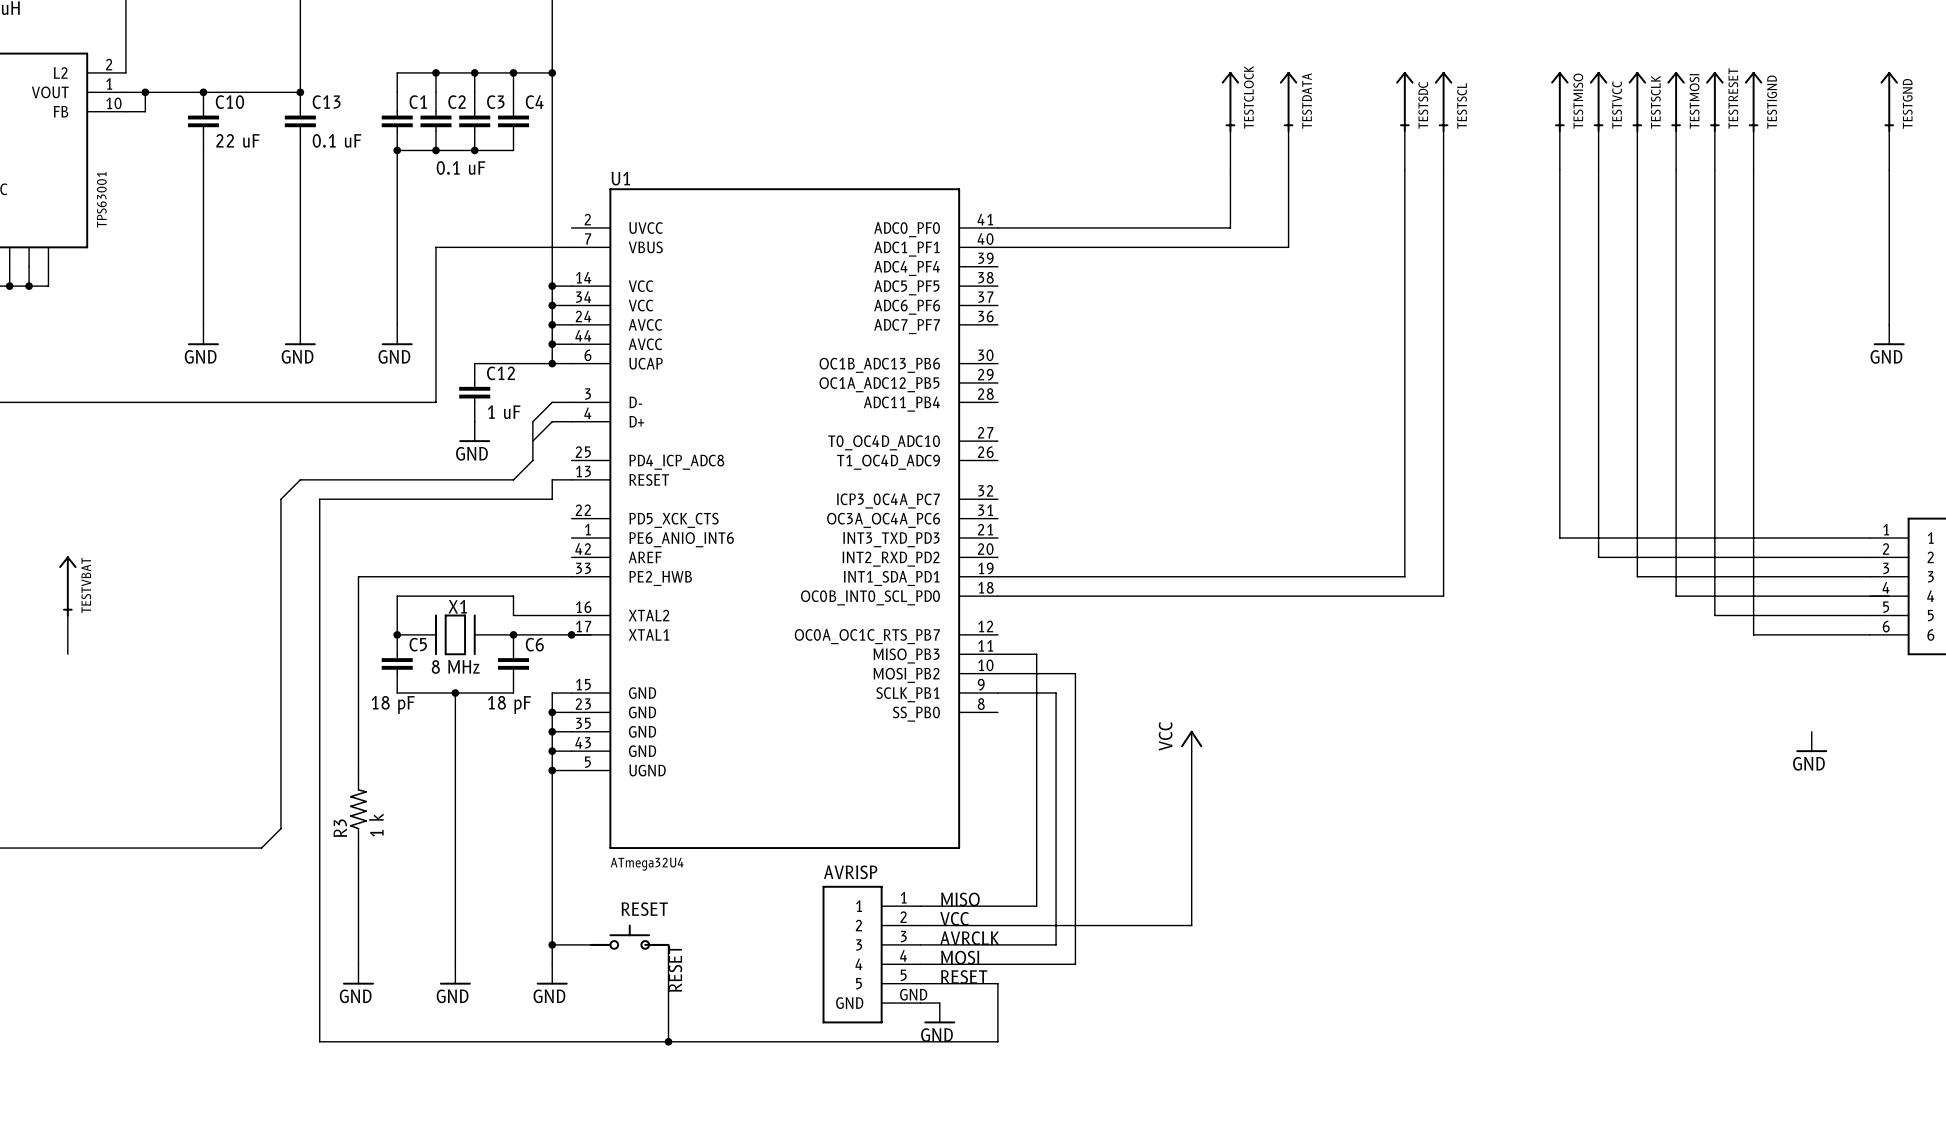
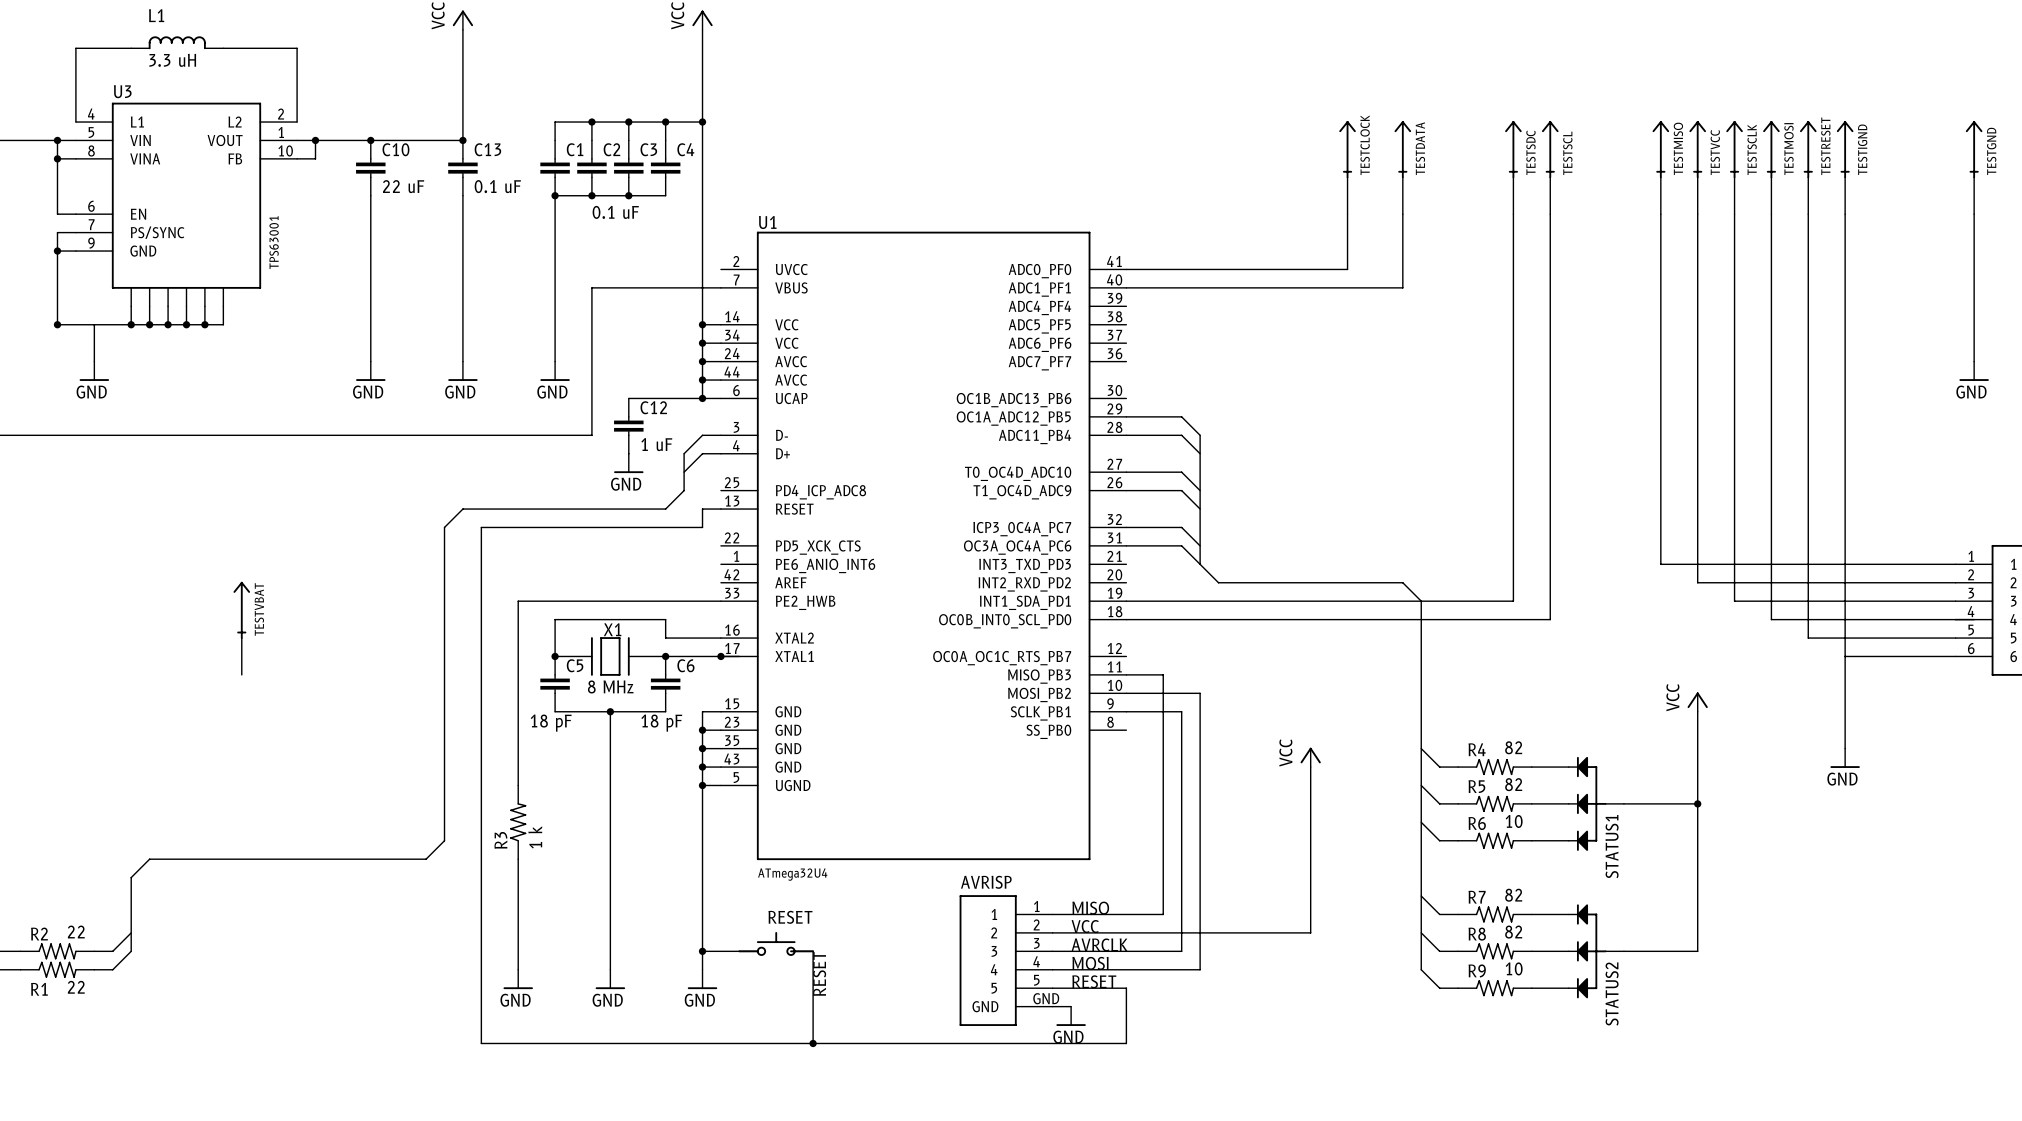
wire: none -> (1126, 416) (1181, 416) (1200, 435)
wire: none -> (1126, 435) (1181, 435) (1200, 453)
bus: none -> (1200, 435) (1200, 564) (1218, 582) (1402, 582) (1421, 601) (1421, 969)
wire: none -> (1126, 472) (1181, 472) (1200, 490)
wire: none -> (1126, 490) (1181, 490) (1200, 509)
wire: none -> (1126, 527) (1181, 527) (1200, 545)
wire: none -> (1126, 545) (1181, 545) (1200, 564)
wire: none -> (1845, 656) (1845, 748)
power symbol: none -> VCC (1697, 702)
wire: none -> (1697, 711) (1697, 951) (1623, 951)
wire: none -> (1421, 748) (1439, 767) (1458, 767)
power symbol position: GND (1811, 741) -> GND (1845, 758)
R4: none -> 82 (1494, 767)
wire: none -> (1531, 767) (1568, 767)
wire: none -> (1421, 785) (1439, 803) (1458, 803)
R5: none -> 82 (1494, 803)
wire: none -> (1531, 803) (1568, 803)
STATUS1: none -> (1596, 803)
wire: none -> (1623, 803) (1697, 803)
junction: none -> (1697, 803)
wire: none -> (1421, 822) (1439, 840) (1458, 840)
R6: none -> 10 (1494, 840)
wire: none -> (1531, 840) (1568, 840)
wire: none -> (1421, 896) (1439, 914) (1458, 914)
R7: none -> 82 (1494, 914)
wire: none -> (1531, 914) (1568, 914)
wire: none -> (1421, 932) (1439, 951) (1458, 951)
R8: none -> 82 (1494, 951)
wire: none -> (1531, 951) (1568, 951)
STATUS2: none -> (1596, 951)
wire: none -> (1421, 969) (1439, 988) (1458, 988)
R9: none -> 10 (1494, 988)
wire: none -> (1531, 988) (1568, 988)

